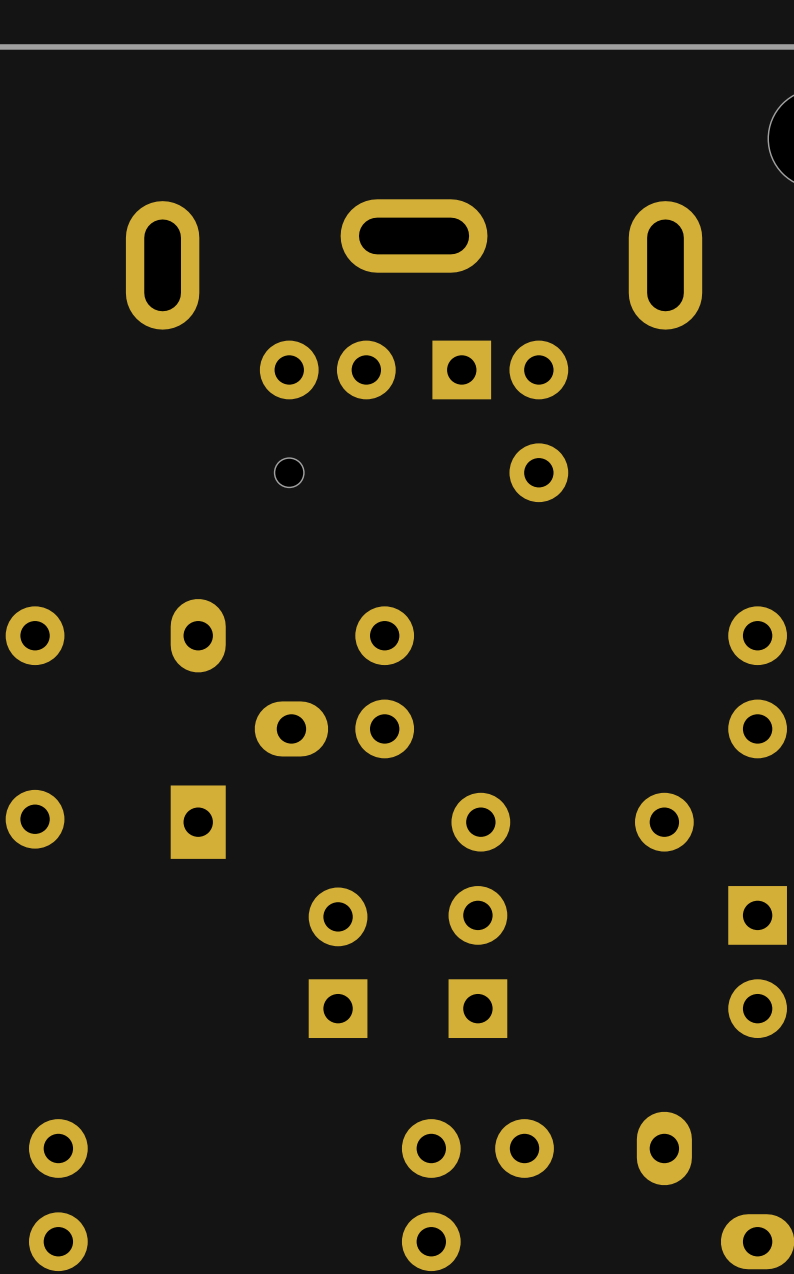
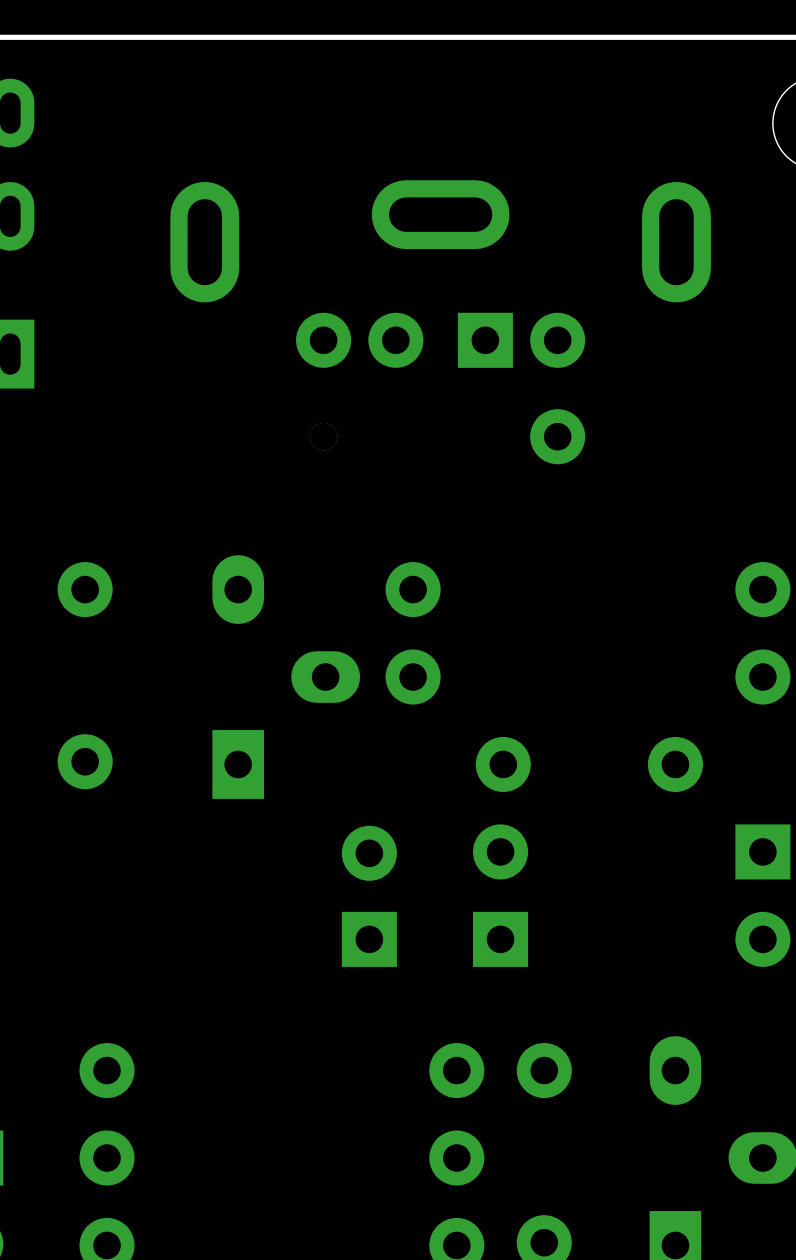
part footprint: [125, 199, 703, 503] -> [170, 180, 711, 465]

